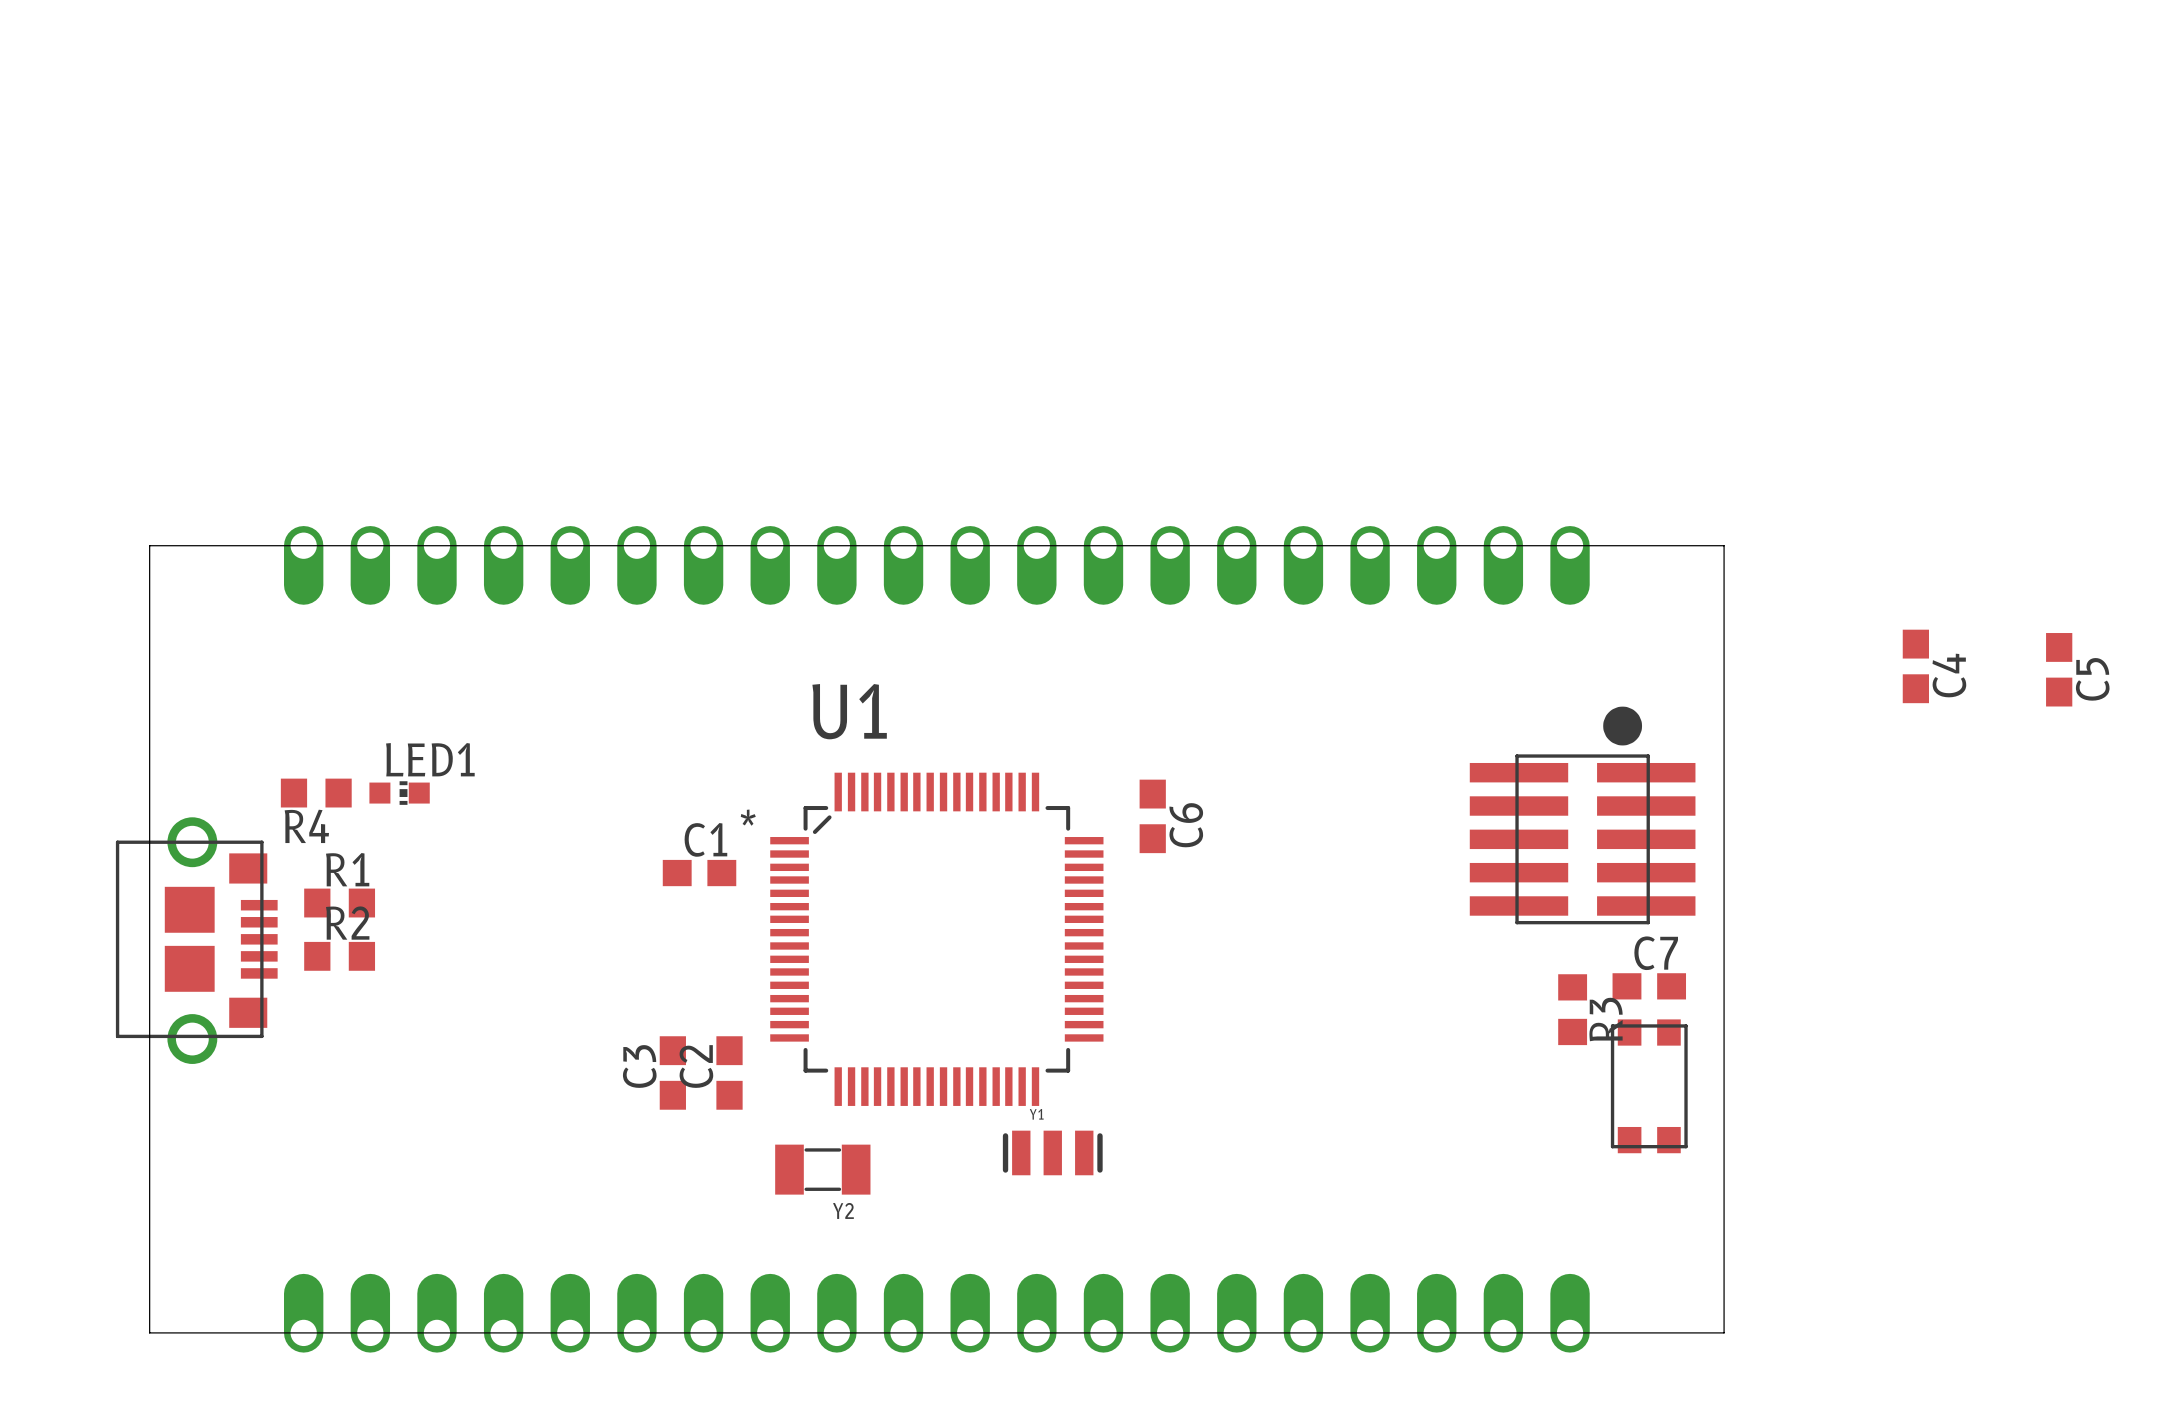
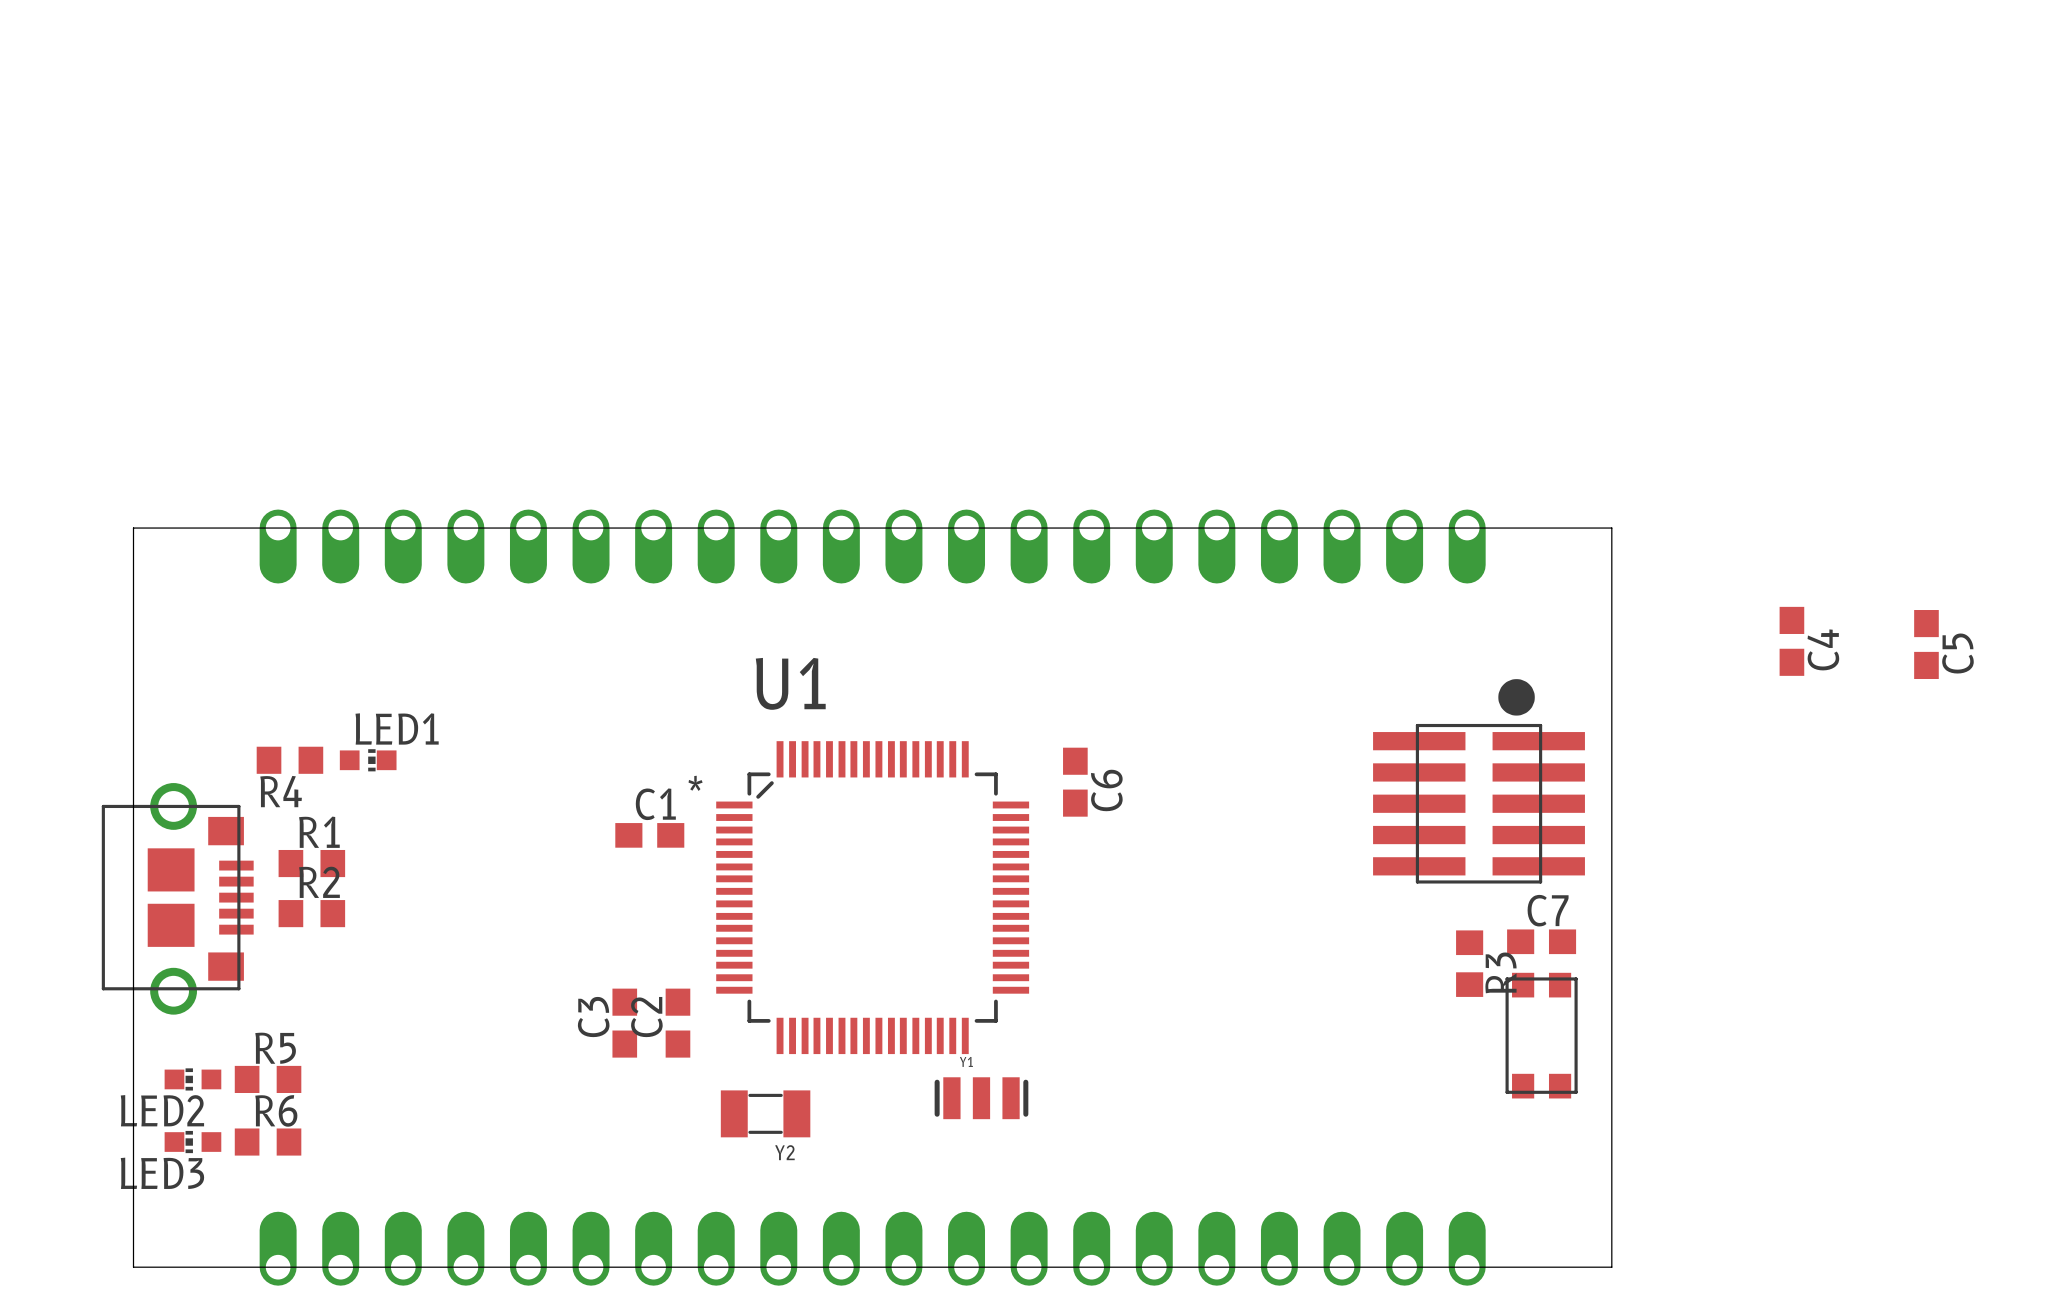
LED2: none -> (192, 1079)
R5: none -> (268, 1079)
LED3: none -> (192, 1142)
R6: none -> (268, 1142)

